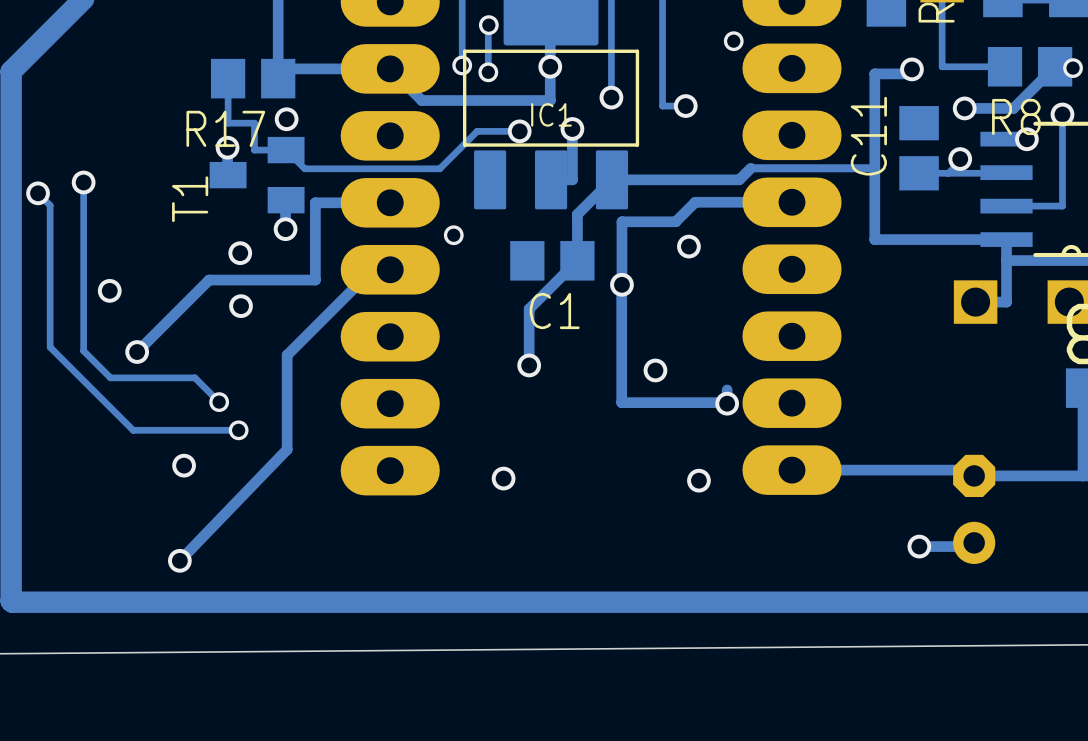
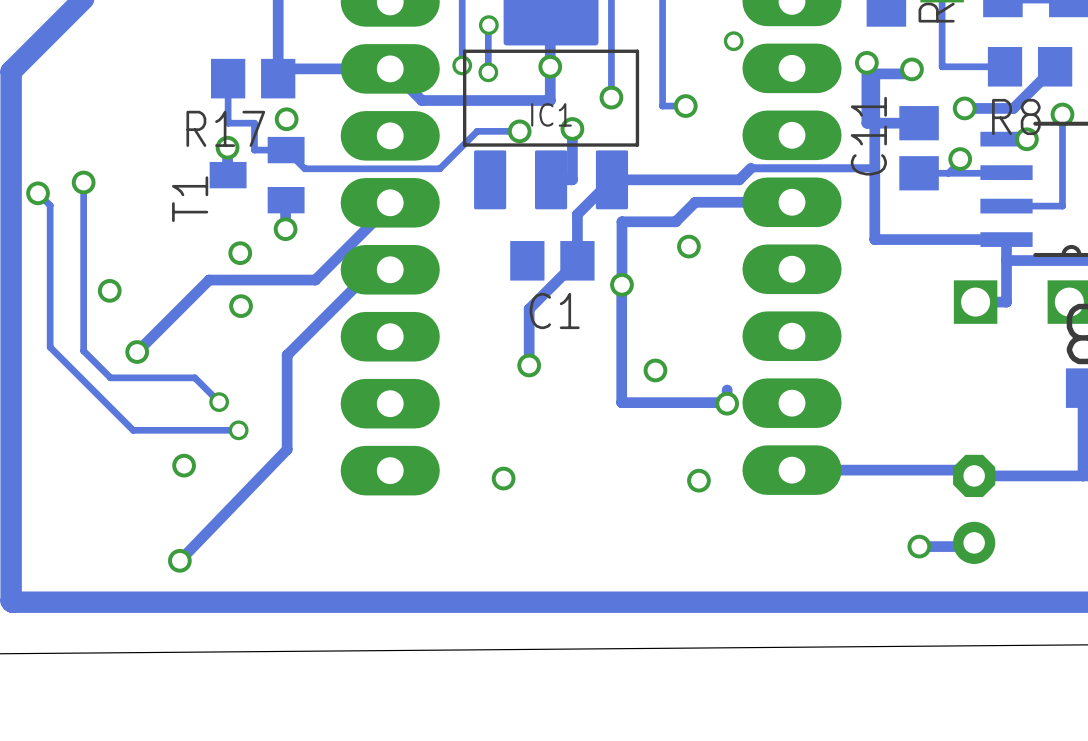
track: none -> (866, 62) (866, 123) (919, 123)
via: none -> (866, 62)
via: (1073, 68) -> none
track: (390, 202) (315, 202) (315, 280) -> (390, 205) (315, 280)
via: (453, 235) -> none

